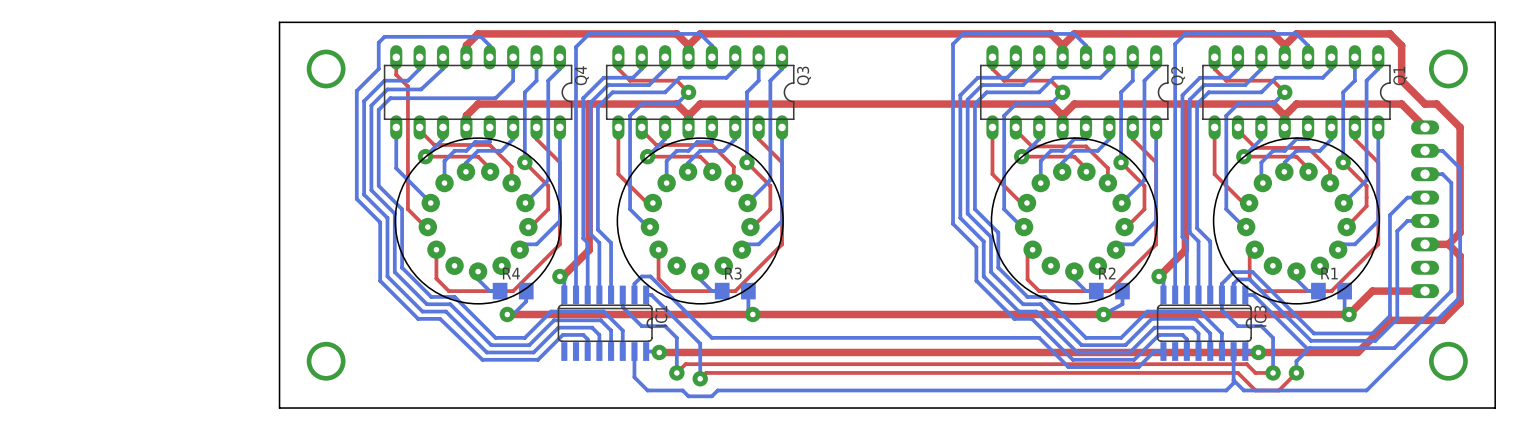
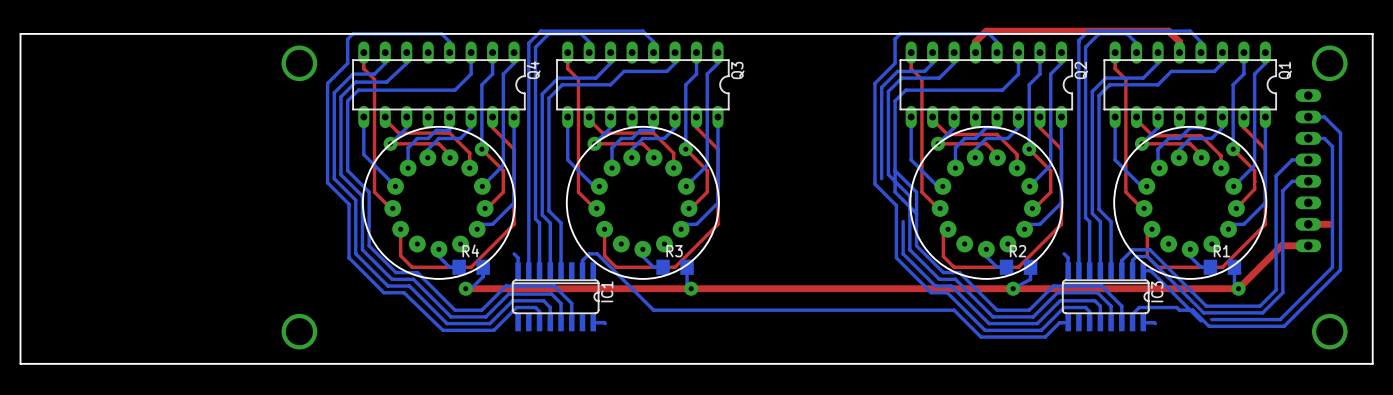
bottom track: (1077, 36) (1074, 33) (963, 33) (953, 44) (953, 90) -> (989, 33) (900, 33) (895, 39) (895, 63) (874, 83)
board edge: (1495, 36) (1495, 22) (279, 22) (279, 408) (1495, 408) (1495, 396) -> (1372, 33) (20, 33) (20, 363) (1372, 363)
top track: (688, 45) (676, 33) (478, 33) (466, 45) (466, 57) -> none
top track: (1062, 45) (1050, 33) (700, 33) (688, 45) -> none
top track: (1284, 45) (1296, 33) (1389, 33) (1401, 45) (1401, 80) (1425, 104) (1436, 104) (1460, 127) (1460, 232) (1448, 244) (1460, 256) (1460, 302) (1442, 320) (1389, 320) (1357, 352) (659, 352) -> none
bottom track: (641, 57) (641, 68) (632, 77) (603, 77) (583, 98) -> (589, 52) (589, 41) (581, 33) (548, 33) (535, 47) (535, 90)
bottom track: (1237, 57) (1237, 68) (1229, 77) (1199, 77) (1182, 95) -> (1136, 52) (1136, 43) (1127, 33) (1099, 33) (1085, 47) (1085, 87)
top track: (618, 68) (630, 80) (676, 80) (688, 92) -> (567, 63) (567, 68) (578, 79) (578, 192) (596, 208)
top track: (992, 68) (1004, 80) (1050, 80) (1062, 92) -> (911, 63) (911, 68) (921, 79) (921, 192) (940, 208)
bottom track: (1109, 68) (1100, 77) (1053, 77) (1039, 92) (986, 92) (974, 104) (974, 109) -> (1018, 63) (1018, 74) (1002, 90) (905, 90) (895, 100)
top track: (1214, 68) (1226, 80) (1273, 80) (1284, 92) -> (1115, 63) (1115, 68) (1125, 79) (1125, 192) (1144, 208)
bottom track: (688, 92) (676, 104) (641, 104) (630, 115) (630, 209) (649, 227) -> none
via: (688, 92) -> none
bottom track: (1062, 92) (1050, 104) (1015, 104) (1004, 115) (1004, 209) (1024, 227) -> none
via: (1062, 92) -> none
bottom track: (1284, 92) (1273, 104) (1237, 104) (1226, 115) (1226, 209) (1246, 227) -> none
via: (1284, 92) -> none
top track: (589, 104) (589, 250) (562, 276) (559, 276) -> none
top track: (1185, 104) (1185, 250) (1159, 276) -> none
top track: (688, 115) (676, 104) (478, 104) (466, 115) (466, 127) -> none
top track: (1062, 115) (1050, 104) (700, 104) (688, 115) -> none
top track: (1284, 115) (1296, 104) (1401, 104) (1425, 127) -> none
top track: (1284, 115) (1273, 104) (1074, 104) (1062, 115) -> none
bottom track: none -> (567, 117) (567, 159) (594, 186) (599, 186)
top track: (618, 127) (618, 174) (647, 203) (652, 203) -> none
bottom track: none -> (911, 117) (911, 159) (937, 186) (942, 186)
top track: (992, 127) (992, 174) (1021, 203) (1026, 203) -> none
bottom track: none -> (1115, 117) (1115, 159) (1141, 186) (1146, 186)
top track: (1214, 127) (1214, 174) (1243, 203) (1249, 203) -> none
bottom track: none -> (1308, 117) (1324, 117) (1340, 133) (1340, 154)
bottom track: (1451, 159) (1460, 168) -> (1332, 146) (1332, 167)
bottom track: (1425, 174) (1442, 174) (1451, 182) -> (1308, 159) (1292, 159) (1276, 176) (1276, 197)
bottom track: none -> (895, 170) (916, 192) (916, 213)
bottom track: (967, 190) (967, 213) (991, 237) -> (888, 174) (909, 196) (909, 217)
bottom track: (960, 194) (960, 218) (983, 241) -> none
bottom track: (953, 200) (953, 223) (976, 247) -> (874, 184) (896, 205) (896, 227)
bottom track: (1397, 207) (1389, 215) -> (1282, 190) (1282, 212)
part position: (1425, 209) -> (1308, 170)
bottom track: (1425, 220) (1407, 220) (1397, 231) -> none
via: (559, 276) -> none
via: (1159, 276) -> none
top track: (1425, 291) (1372, 291) -> (1308, 245) (1281, 245) (1260, 267)
bottom track: (622, 294) (622, 307) (641, 326) (665, 326) (676, 337) (676, 372) -> none
bottom track: (646, 294) (651, 294) (700, 343) (700, 378) -> none
bottom track: (1221, 294) (1221, 310) (1237, 326) (1261, 326) (1273, 337) (1273, 372) -> none
bottom track: (1460, 294) (1460, 296) (1366, 390) (1243, 390) (1233, 380) -> (1340, 269) (1284, 326) (1209, 326) (1192, 310) (1179, 310) (1176, 307) (1139, 307) (1132, 314) (1132, 322)
bottom track: (1319, 348) (1309, 348) (1296, 361) (1296, 372) -> none
bottom track: (1233, 351) (1233, 383) (1226, 390) (717, 390) (711, 396) (688, 396) (682, 390) (647, 390) (634, 377) (634, 351) -> none
via: (659, 352) -> none
via: (1258, 352) -> none
via: (676, 372) -> none
top track: (1273, 372) (1255, 372) (1246, 364) (685, 364) (676, 372) -> none
via: (1273, 372) -> none
top track: (1296, 372) (1278, 390) (1255, 390) (1237, 372) (706, 372) (700, 378) -> none
via: (1296, 372) -> none
via: (700, 378) -> none

